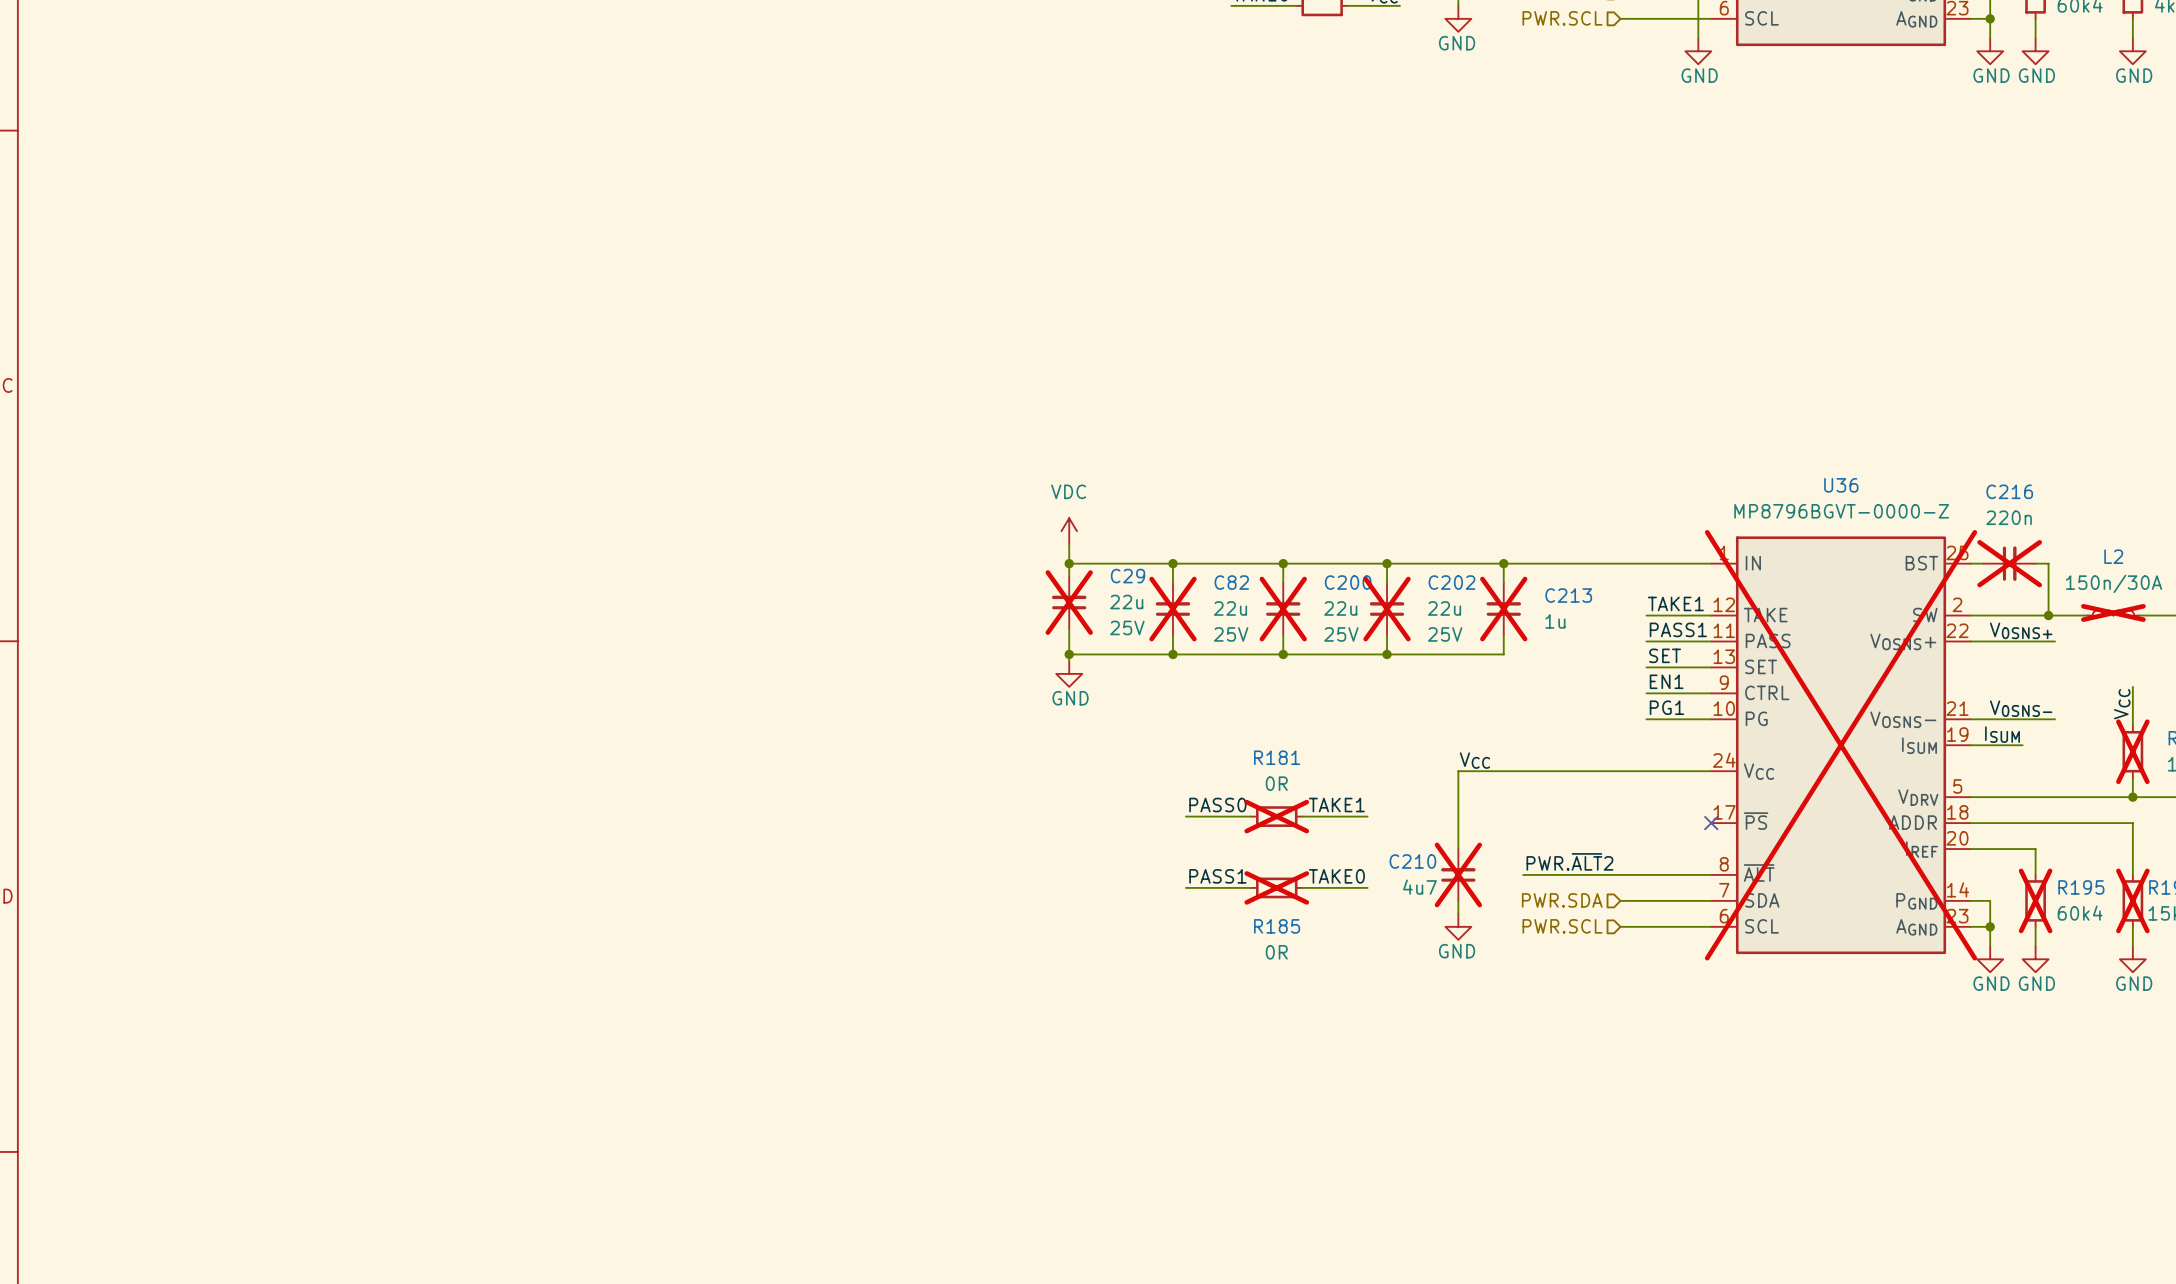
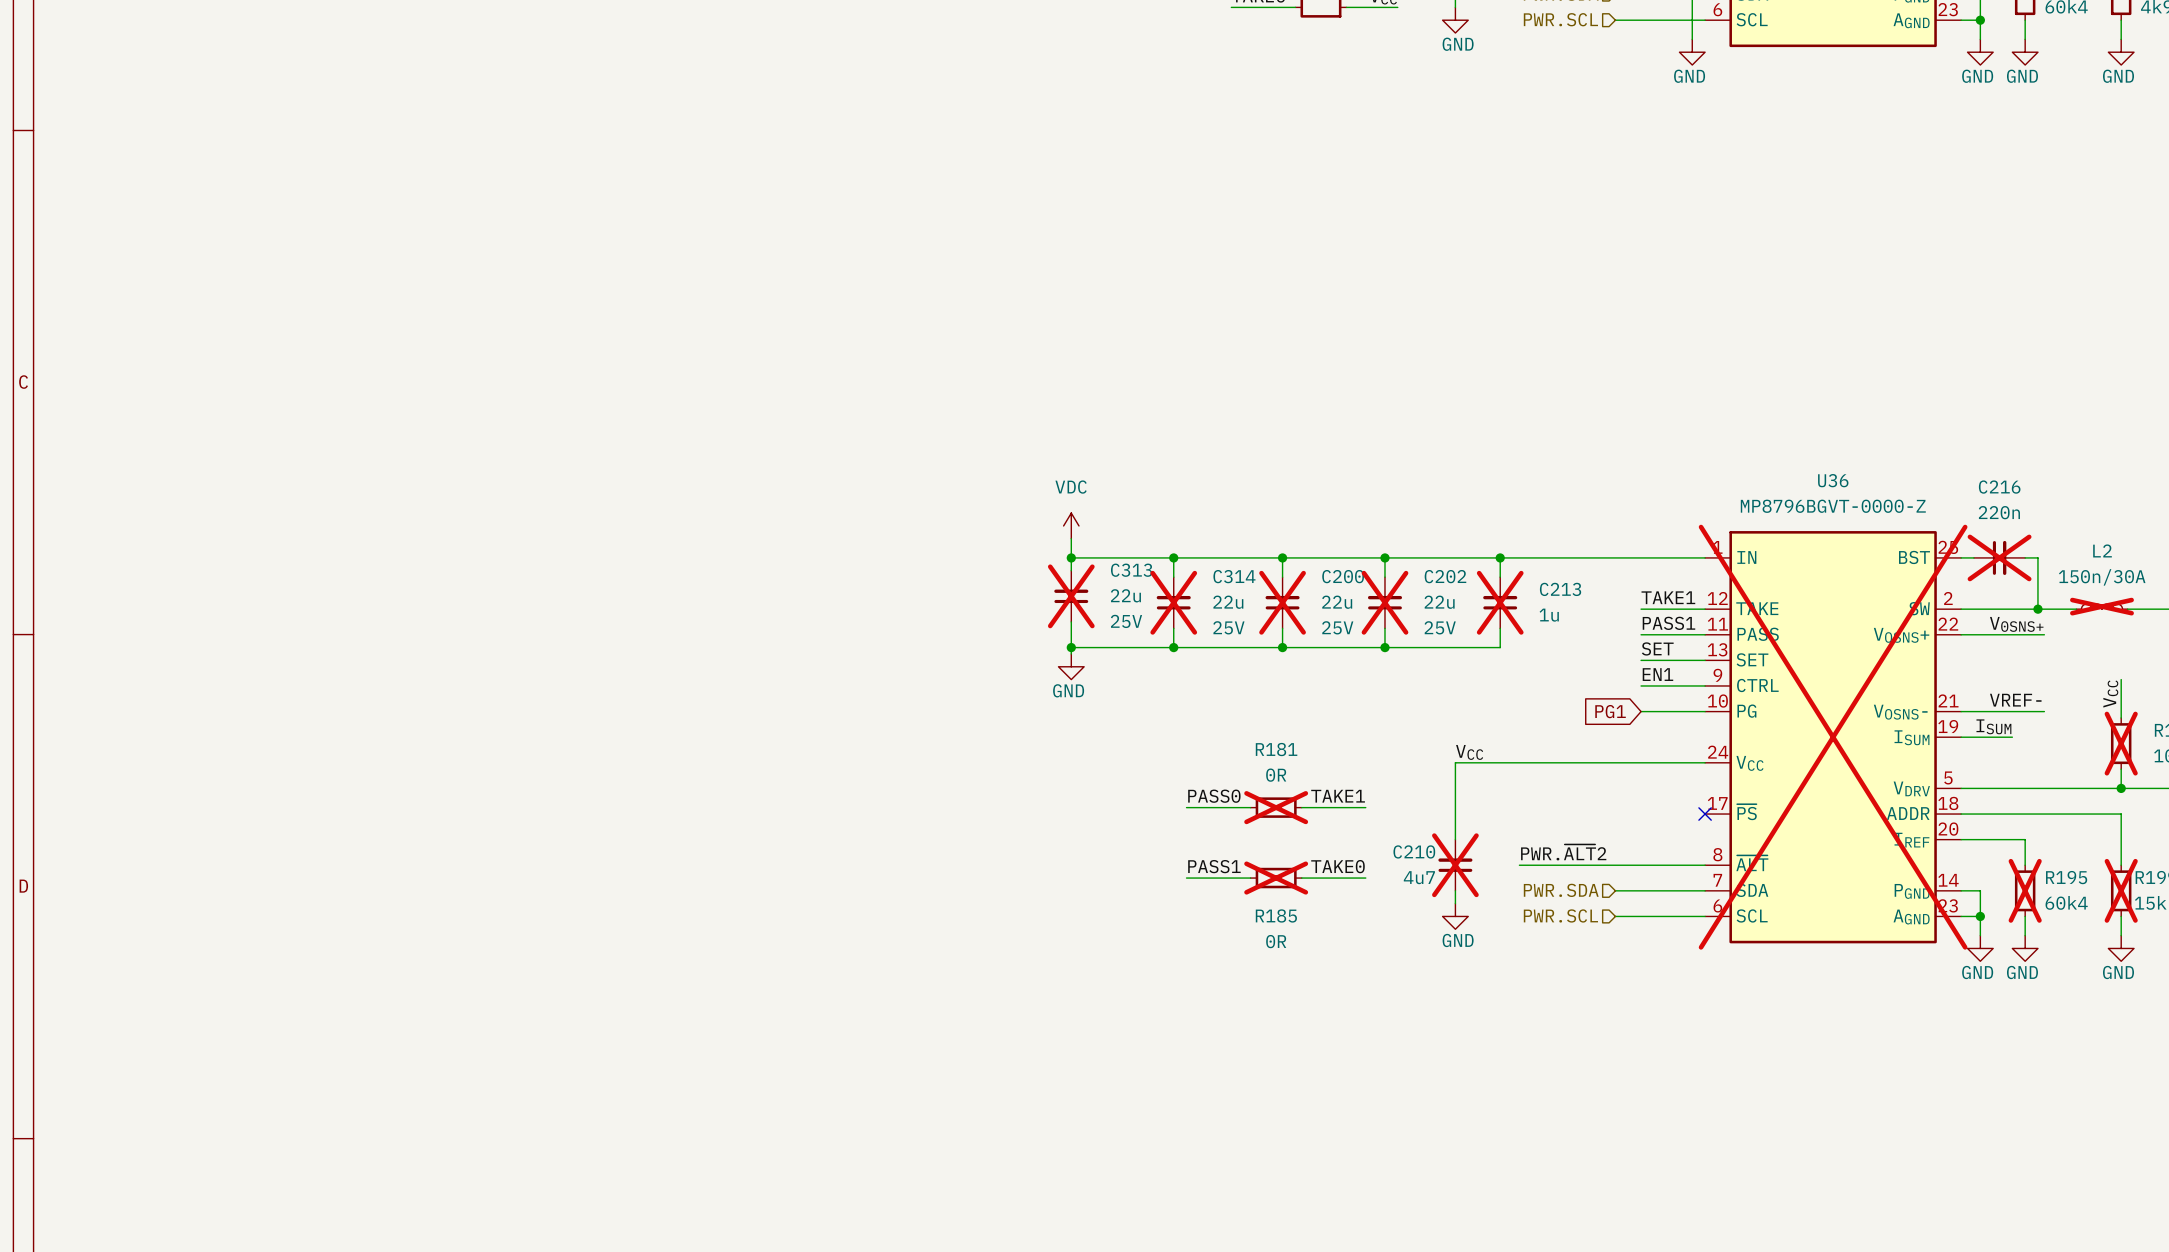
C29 name: C29 (1127, 576) -> C313 (1131, 570)
C82 name: C82 (1231, 582) -> C314 (1234, 576)
label: PG1 (1666, 707) -> none
label: V0SNS- (2021, 708) -> VREF- (2015, 700)
global label: none -> PG1 (1610, 711)

